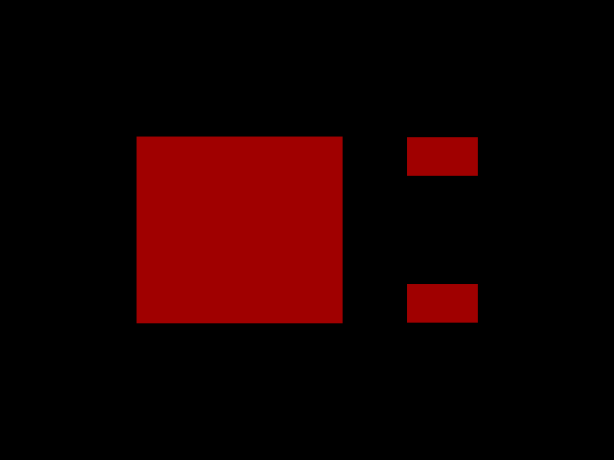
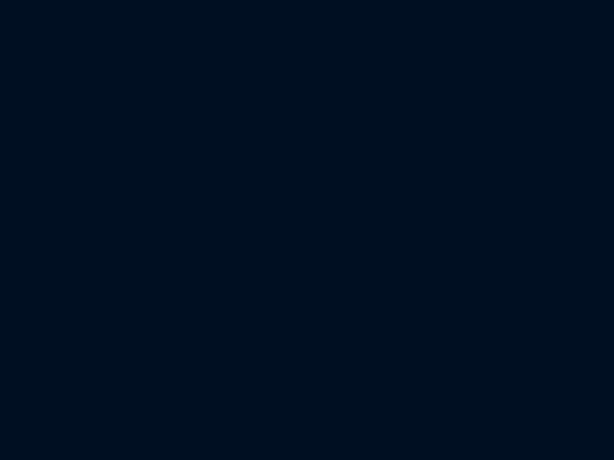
part: (307, 229) -> none

